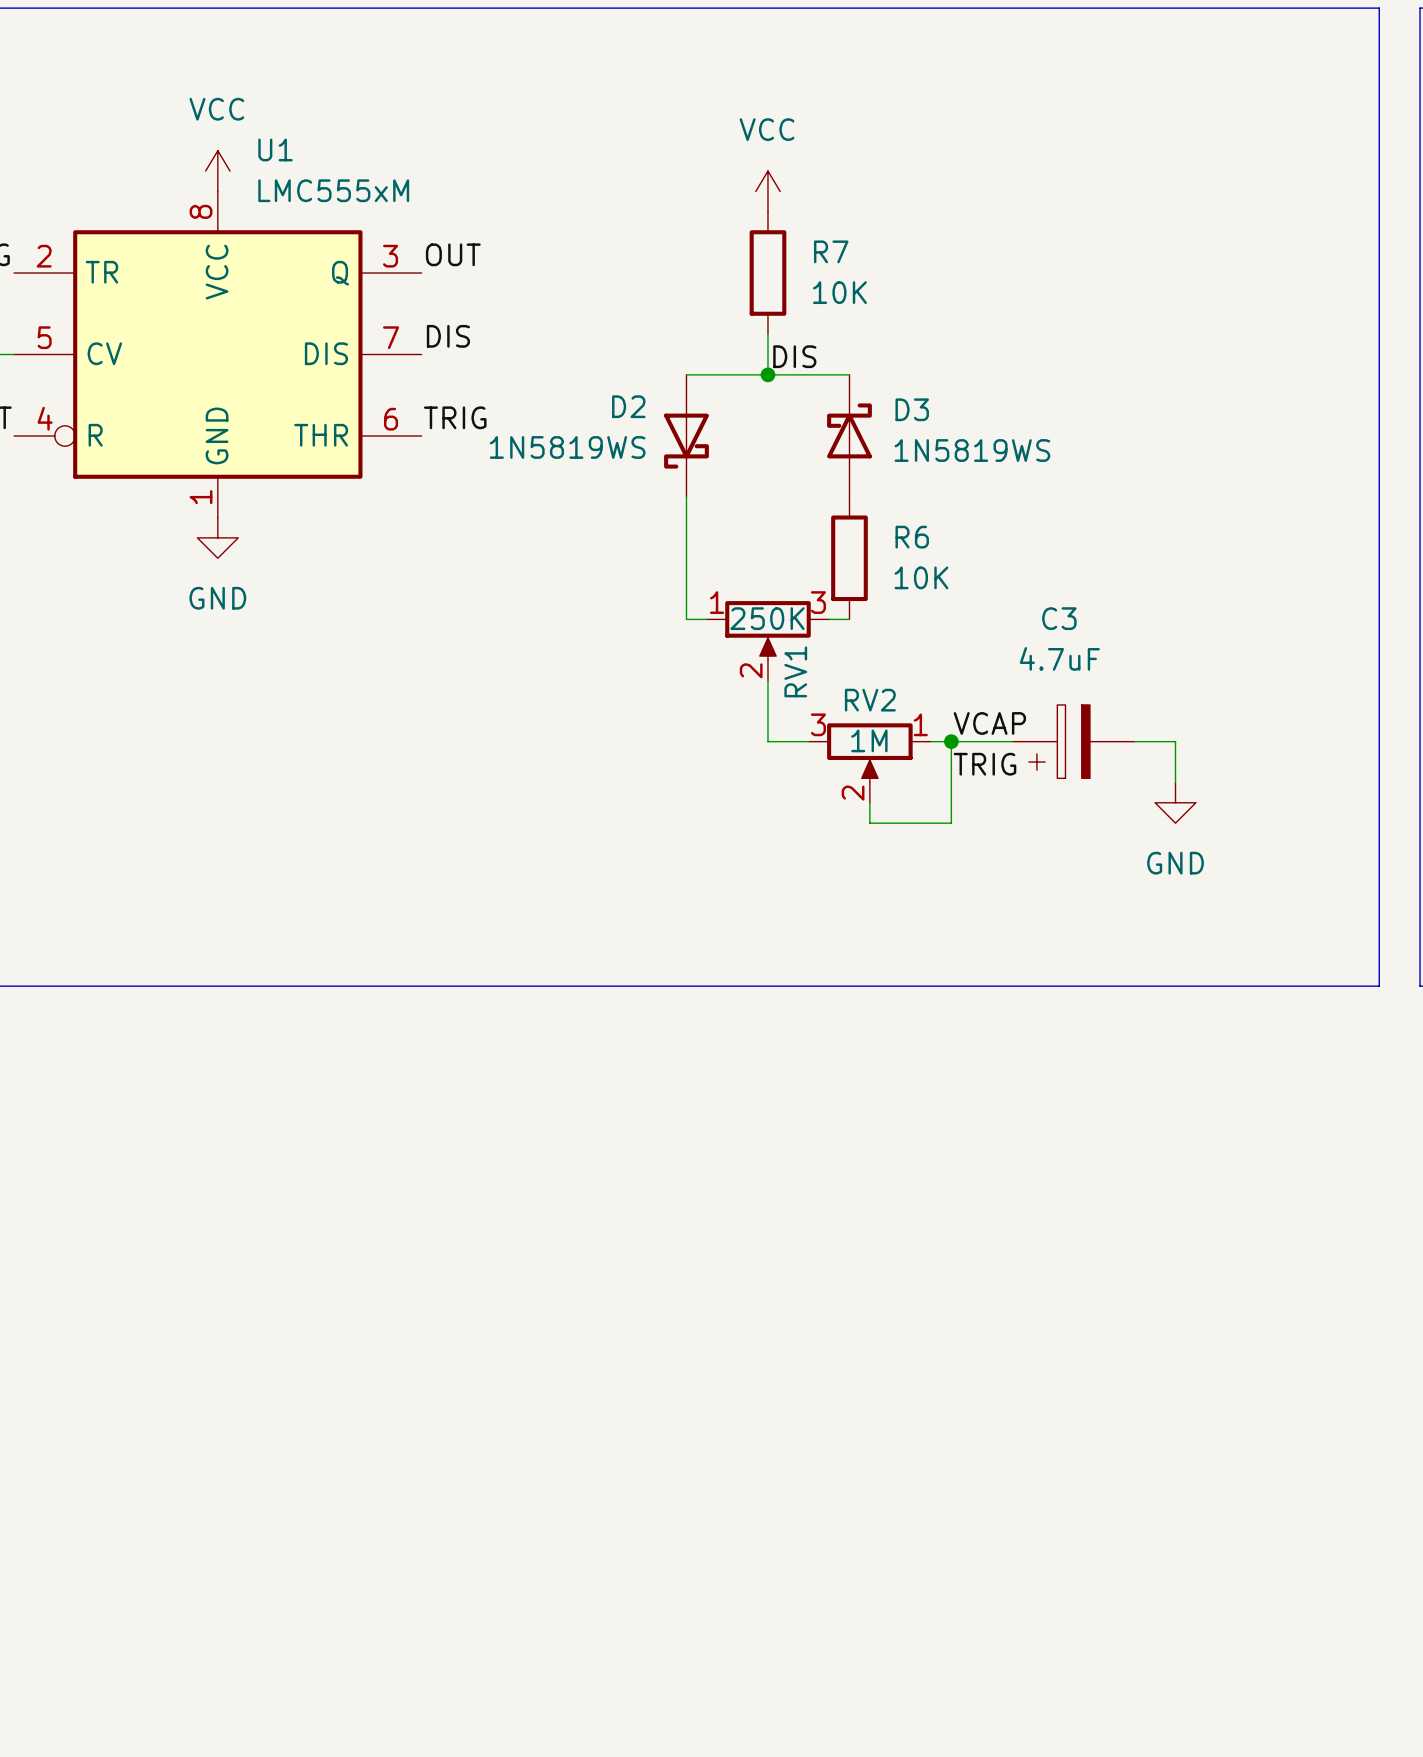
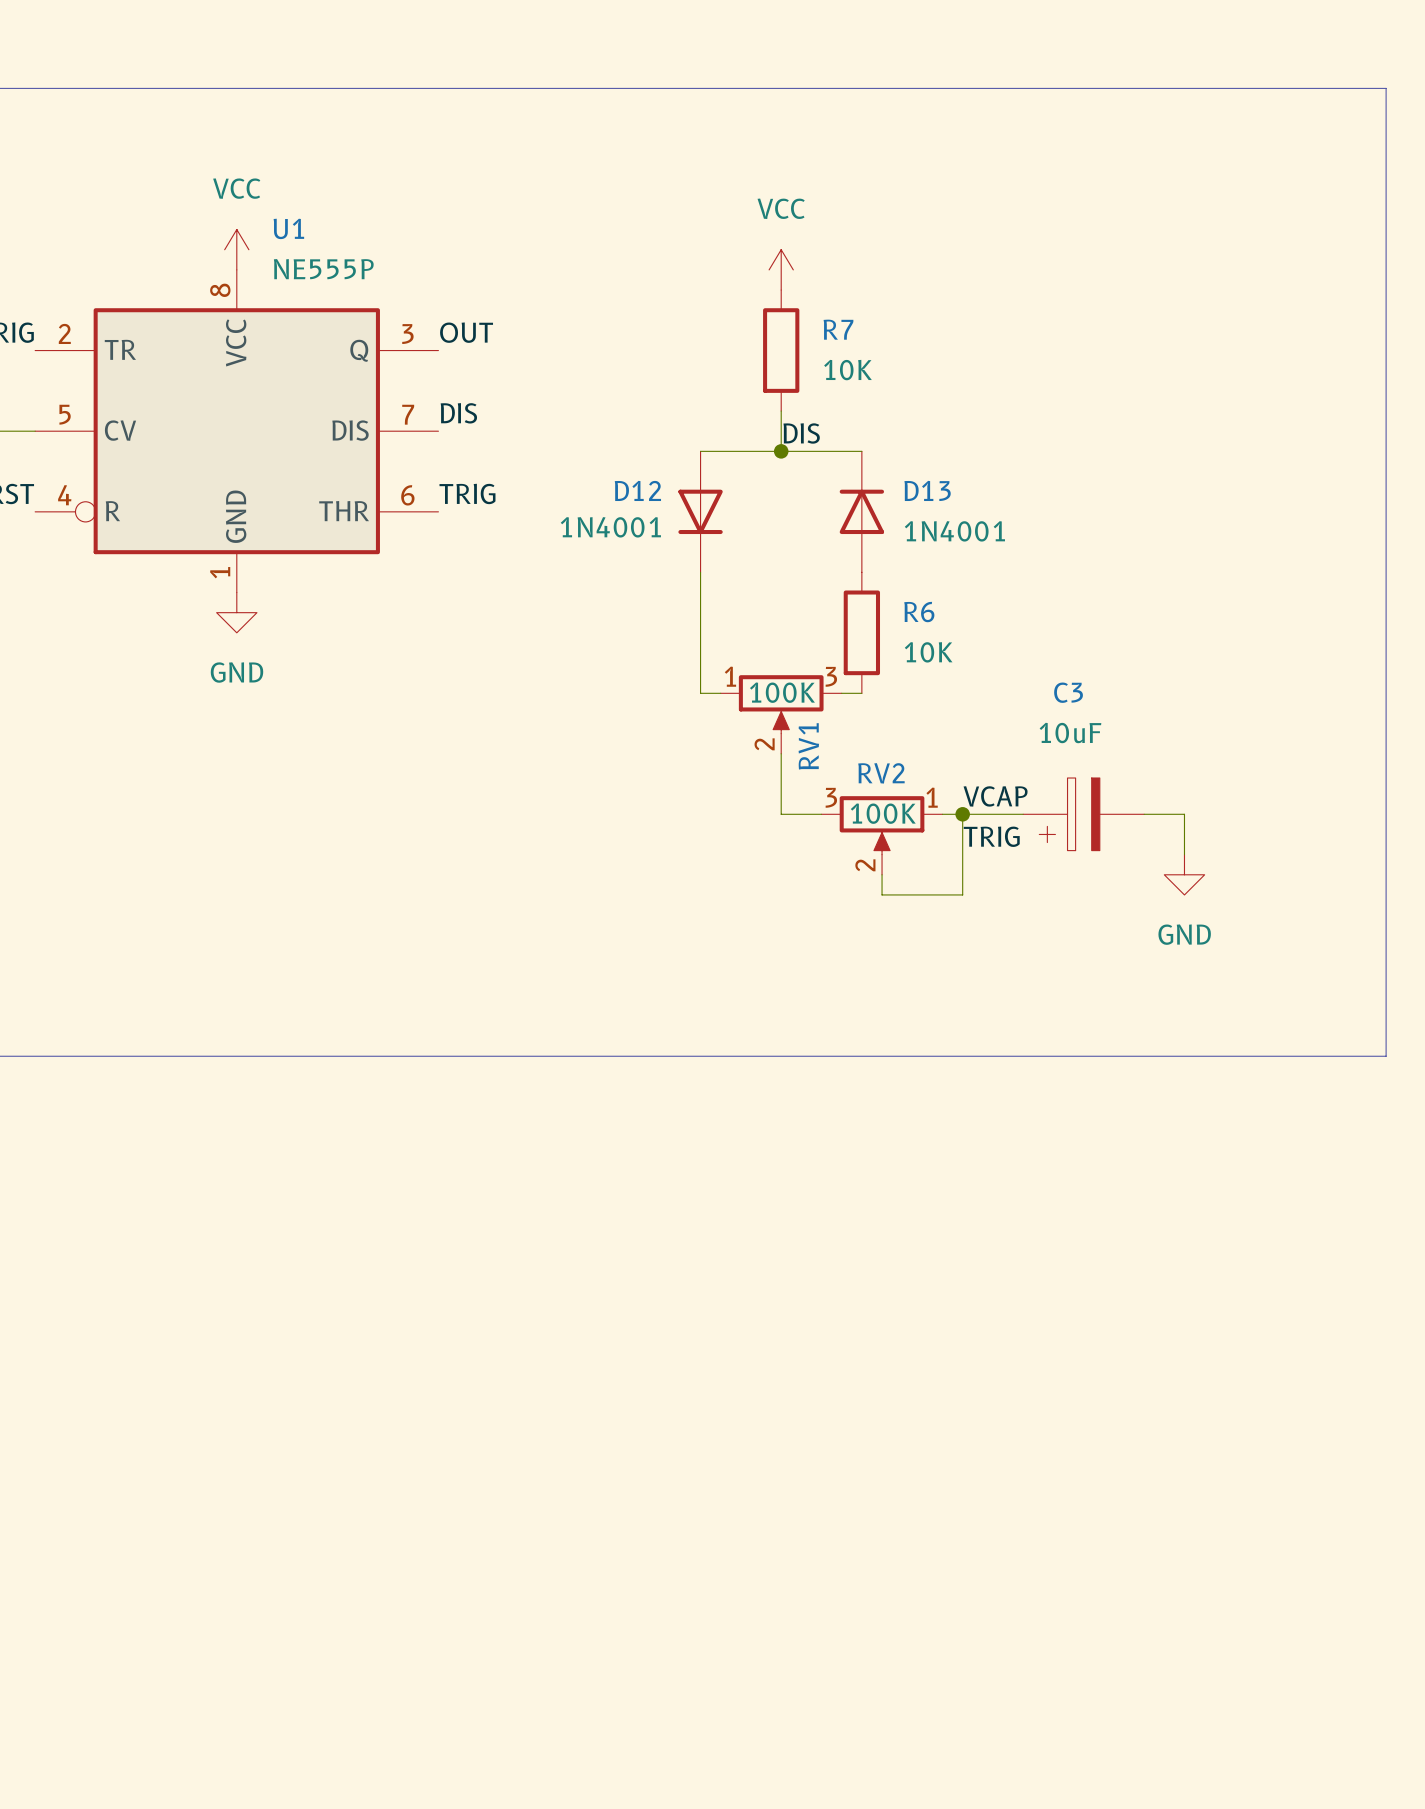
U1 value: LMC555xM (333, 190) -> NE555P (323, 269)
D2: 1N5819WS (686, 436) -> none
D12: none -> 1N4001 (700, 511)
D3: 1N5819WS (849, 436) -> none
D13: none -> 1N4001 (861, 511)
RV1 value: 250K (767, 618) -> 100K (782, 692)
C3 value: 4.7uF (1059, 658) -> 10uF (1070, 733)
RV2 value: 1M (869, 740) -> 100K (883, 813)

